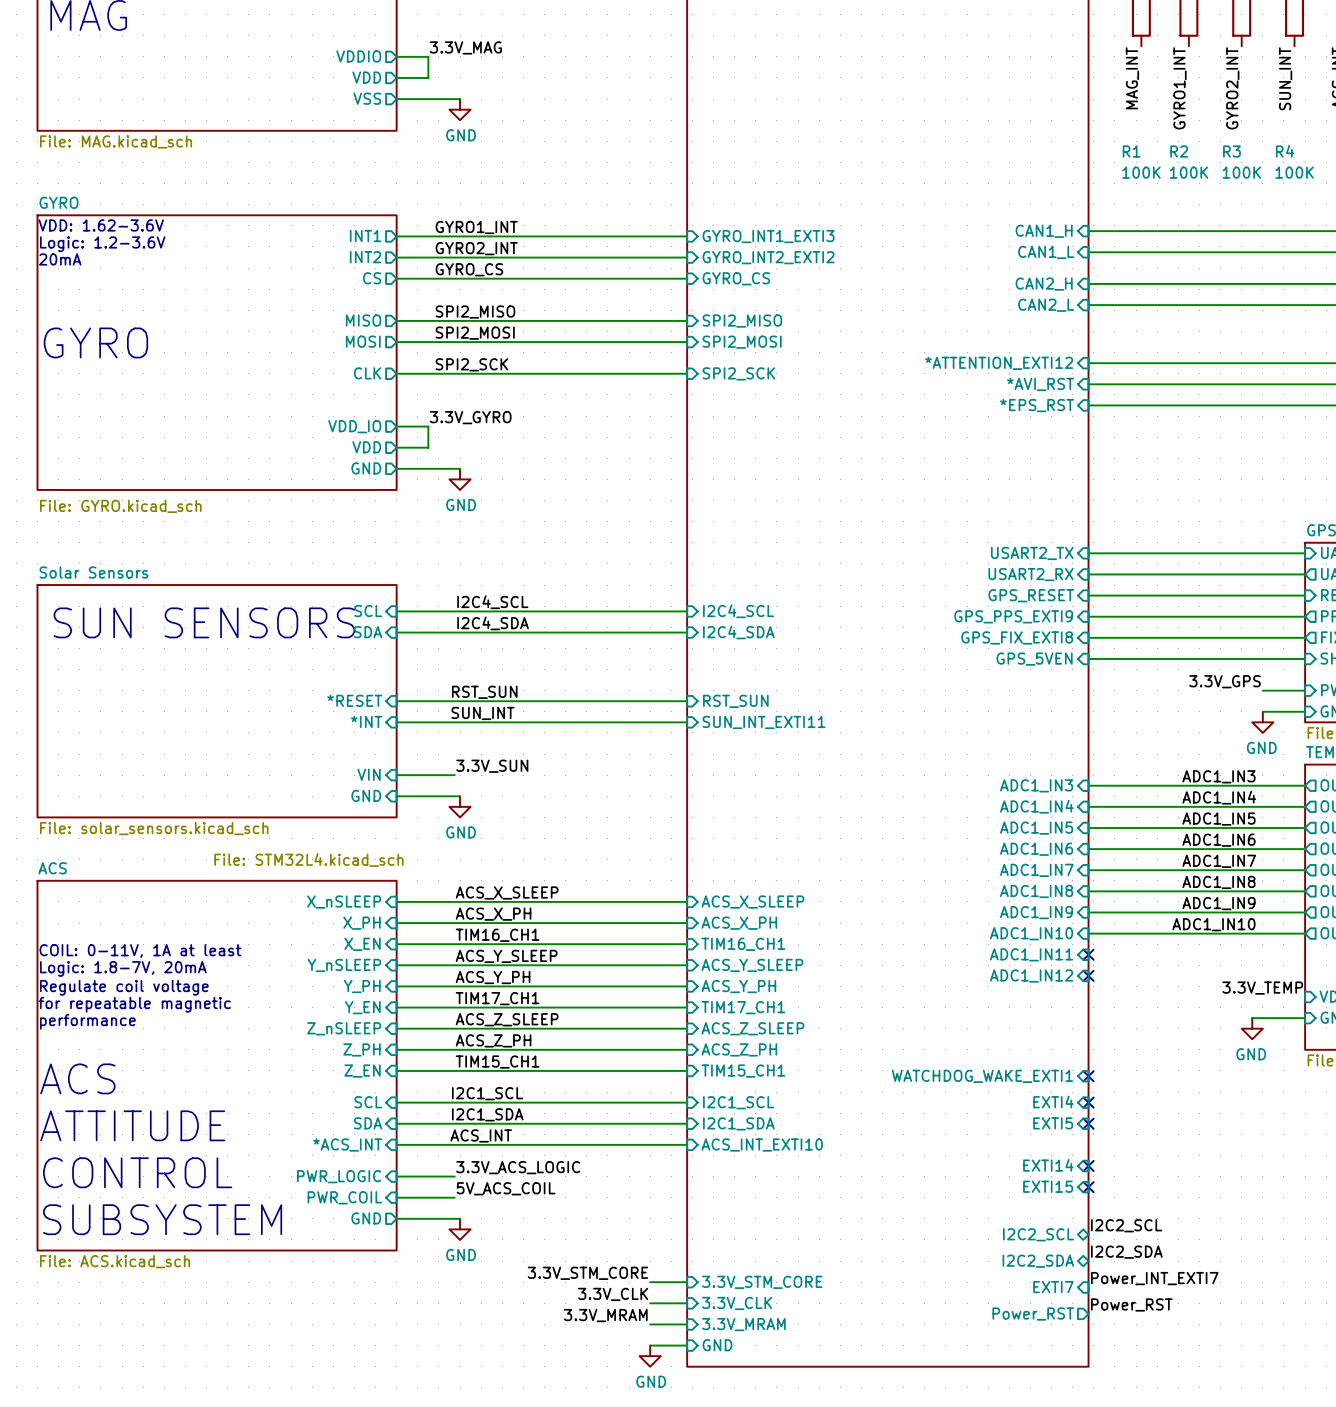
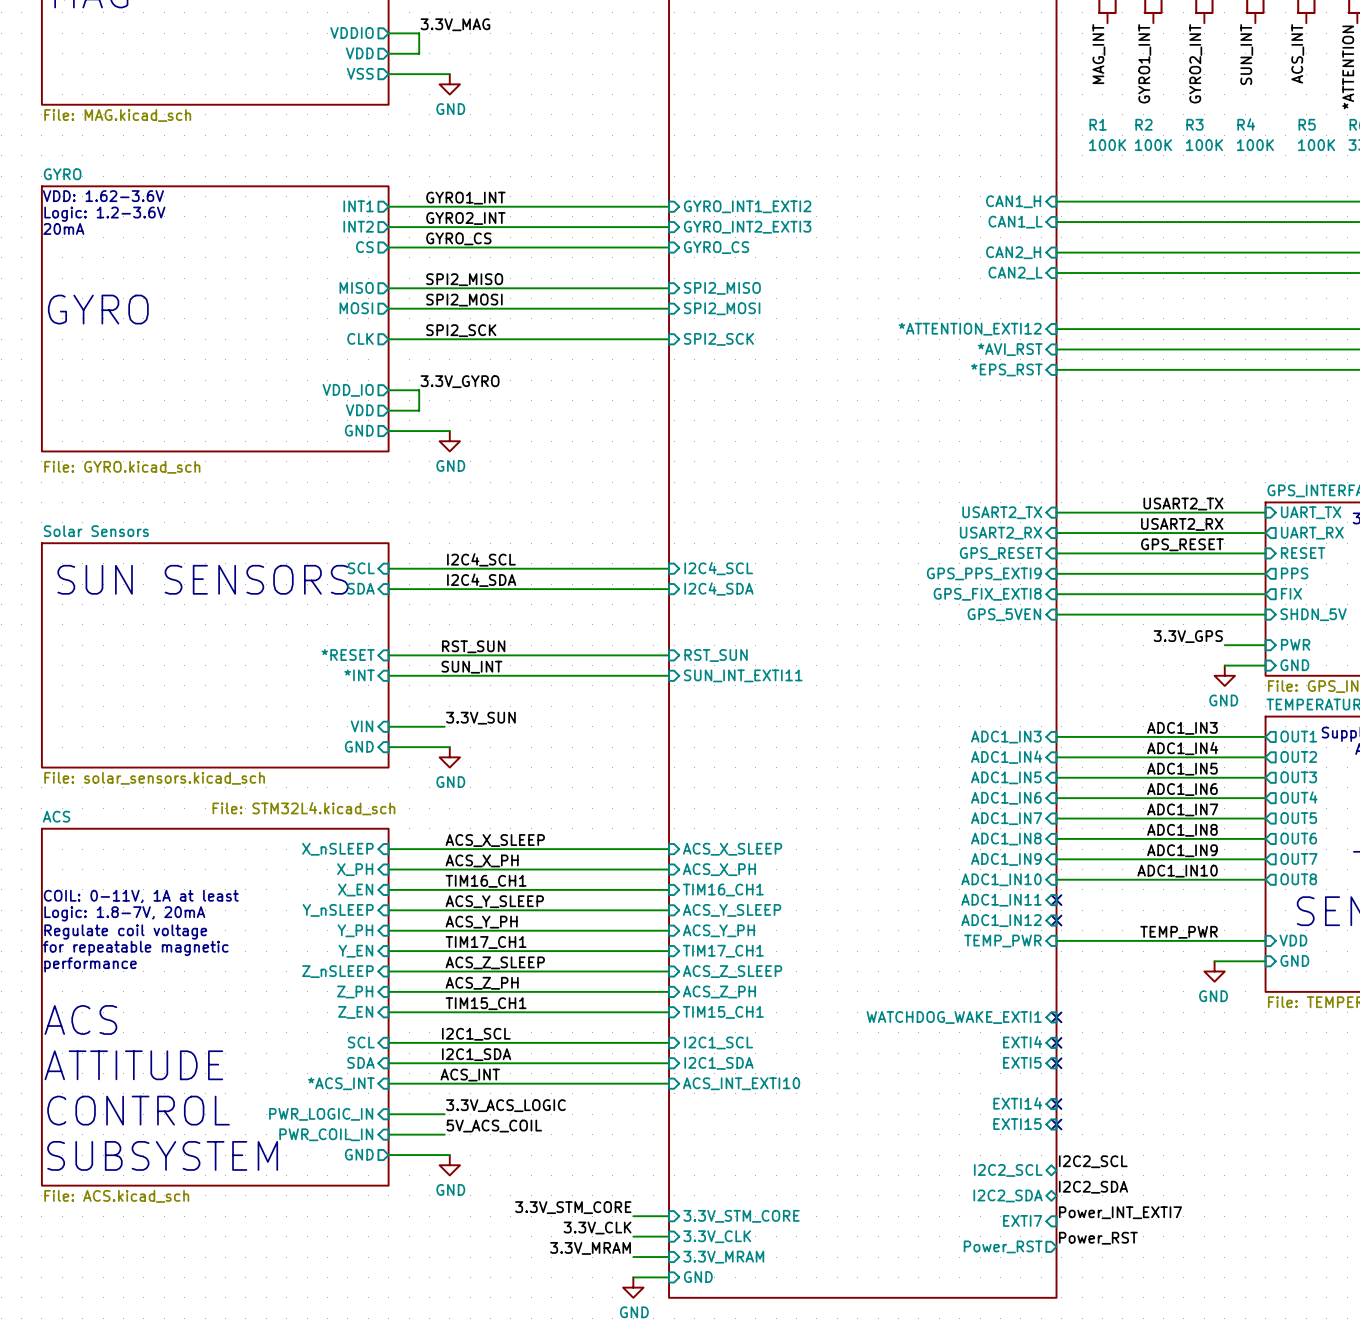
sheet pin: GYRO_INT1_EXTI3 (768, 236) -> GYRO_INT1_EXTI2 (747, 206)
sheet pin: GYRO_INT2_EXTI2 (768, 257) -> GYRO_INT2_EXTI3 (747, 227)
label: none -> USART2_TX (1183, 504)
label: none -> USART2_RX (1182, 524)
label: none -> GPS_RESET (1182, 544)
label: none -> TEMP_PWR (1179, 932)
label: 3.3V_TEMP (1262, 988) -> none
wire: none -> (1056, 940) (1265, 940)
sheet pin: none -> TEMP_PWR (1002, 941)
sheet pin: PWR_LOGIC (339, 1176) -> PWR_LOGIC_IN (321, 1114)
sheet pin: PWR_COIL (344, 1197) -> PWR_COIL_IN (326, 1134)

